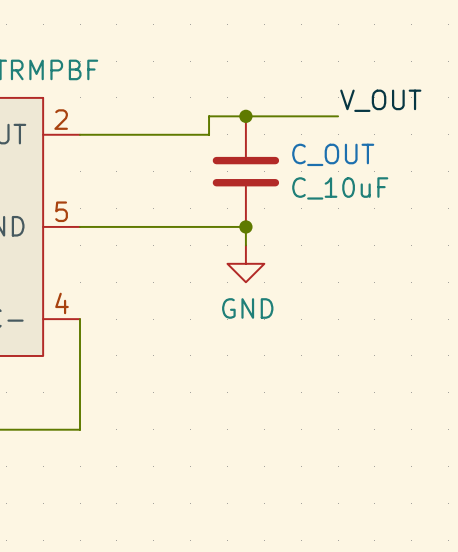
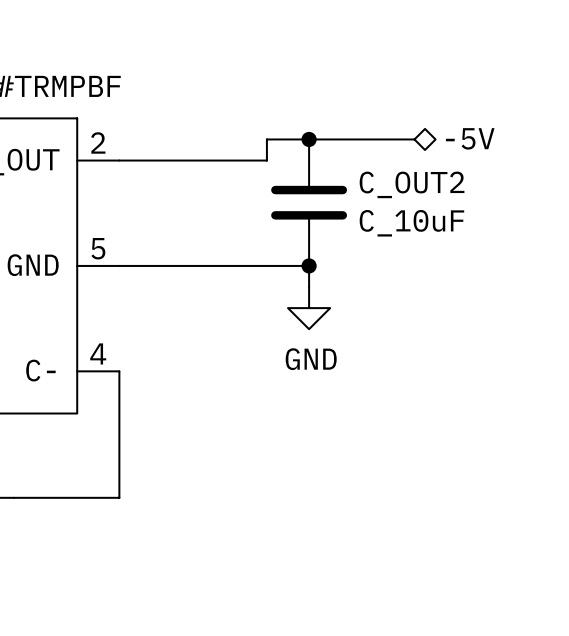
label: V_OUT (380, 100) -> none
hierarchical label: none -> -5V (470, 138)
C_OUT name: C_OUT (333, 154) -> C_OUT2 (412, 184)

